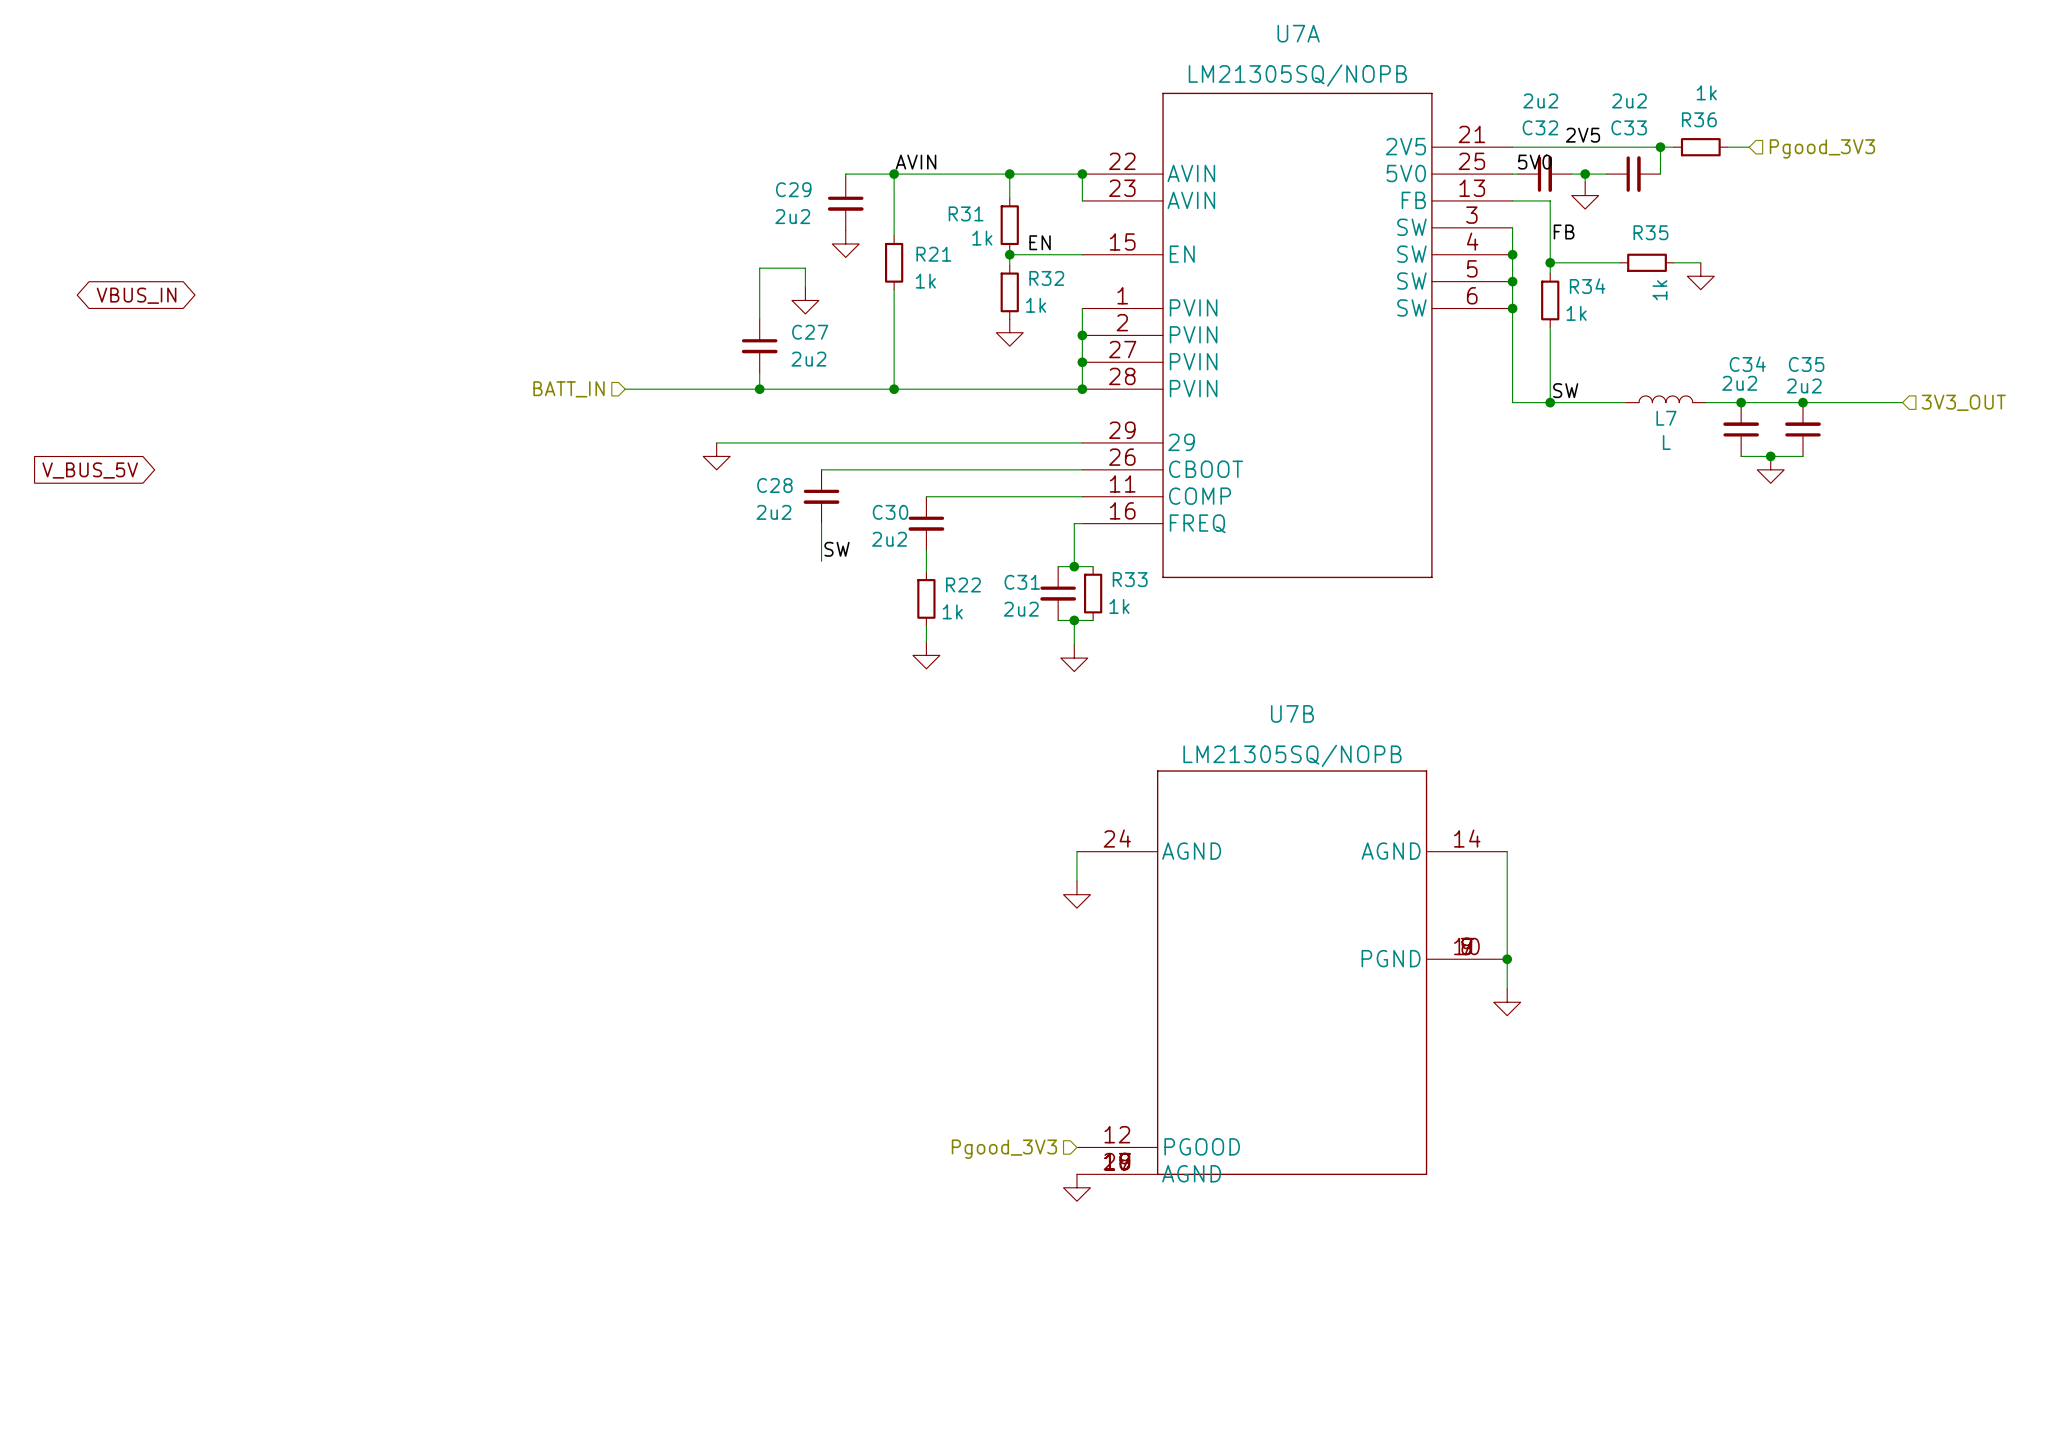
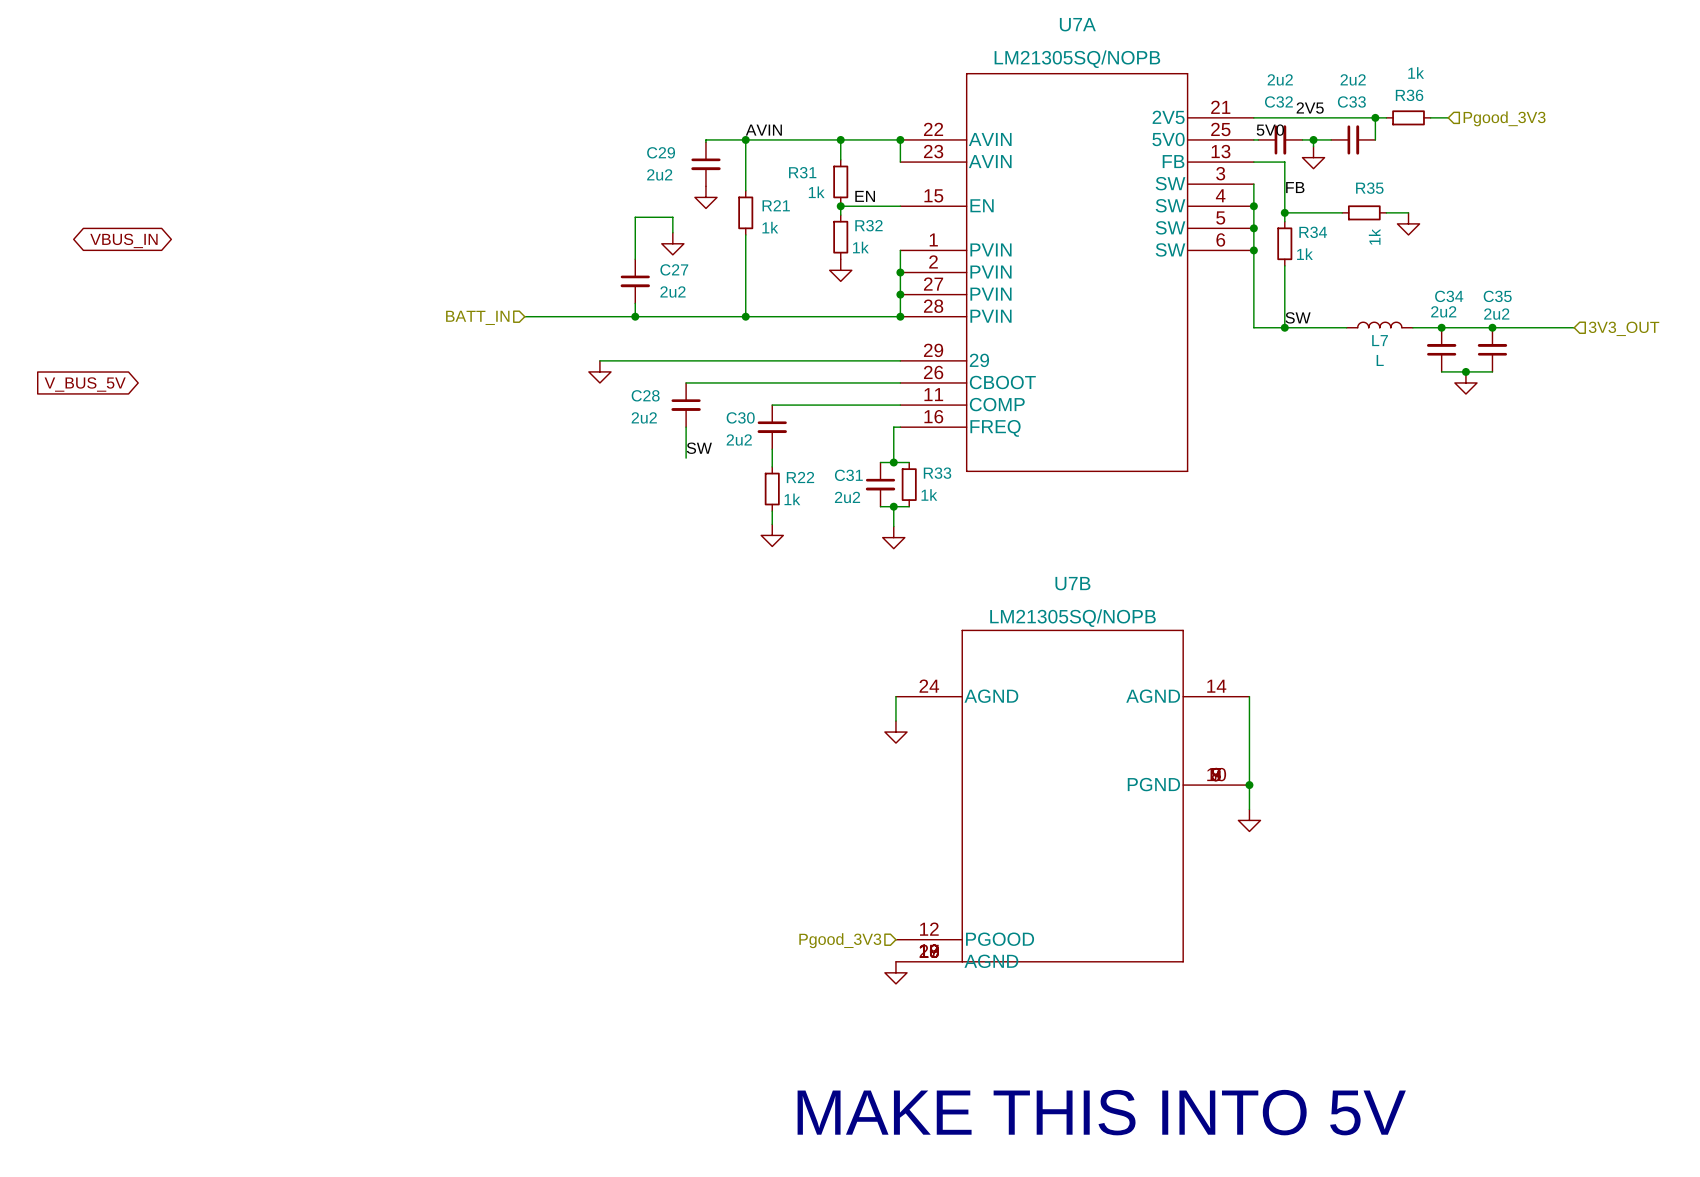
text: none -> MAKE THIS INTO 5V (1101, 1112)

